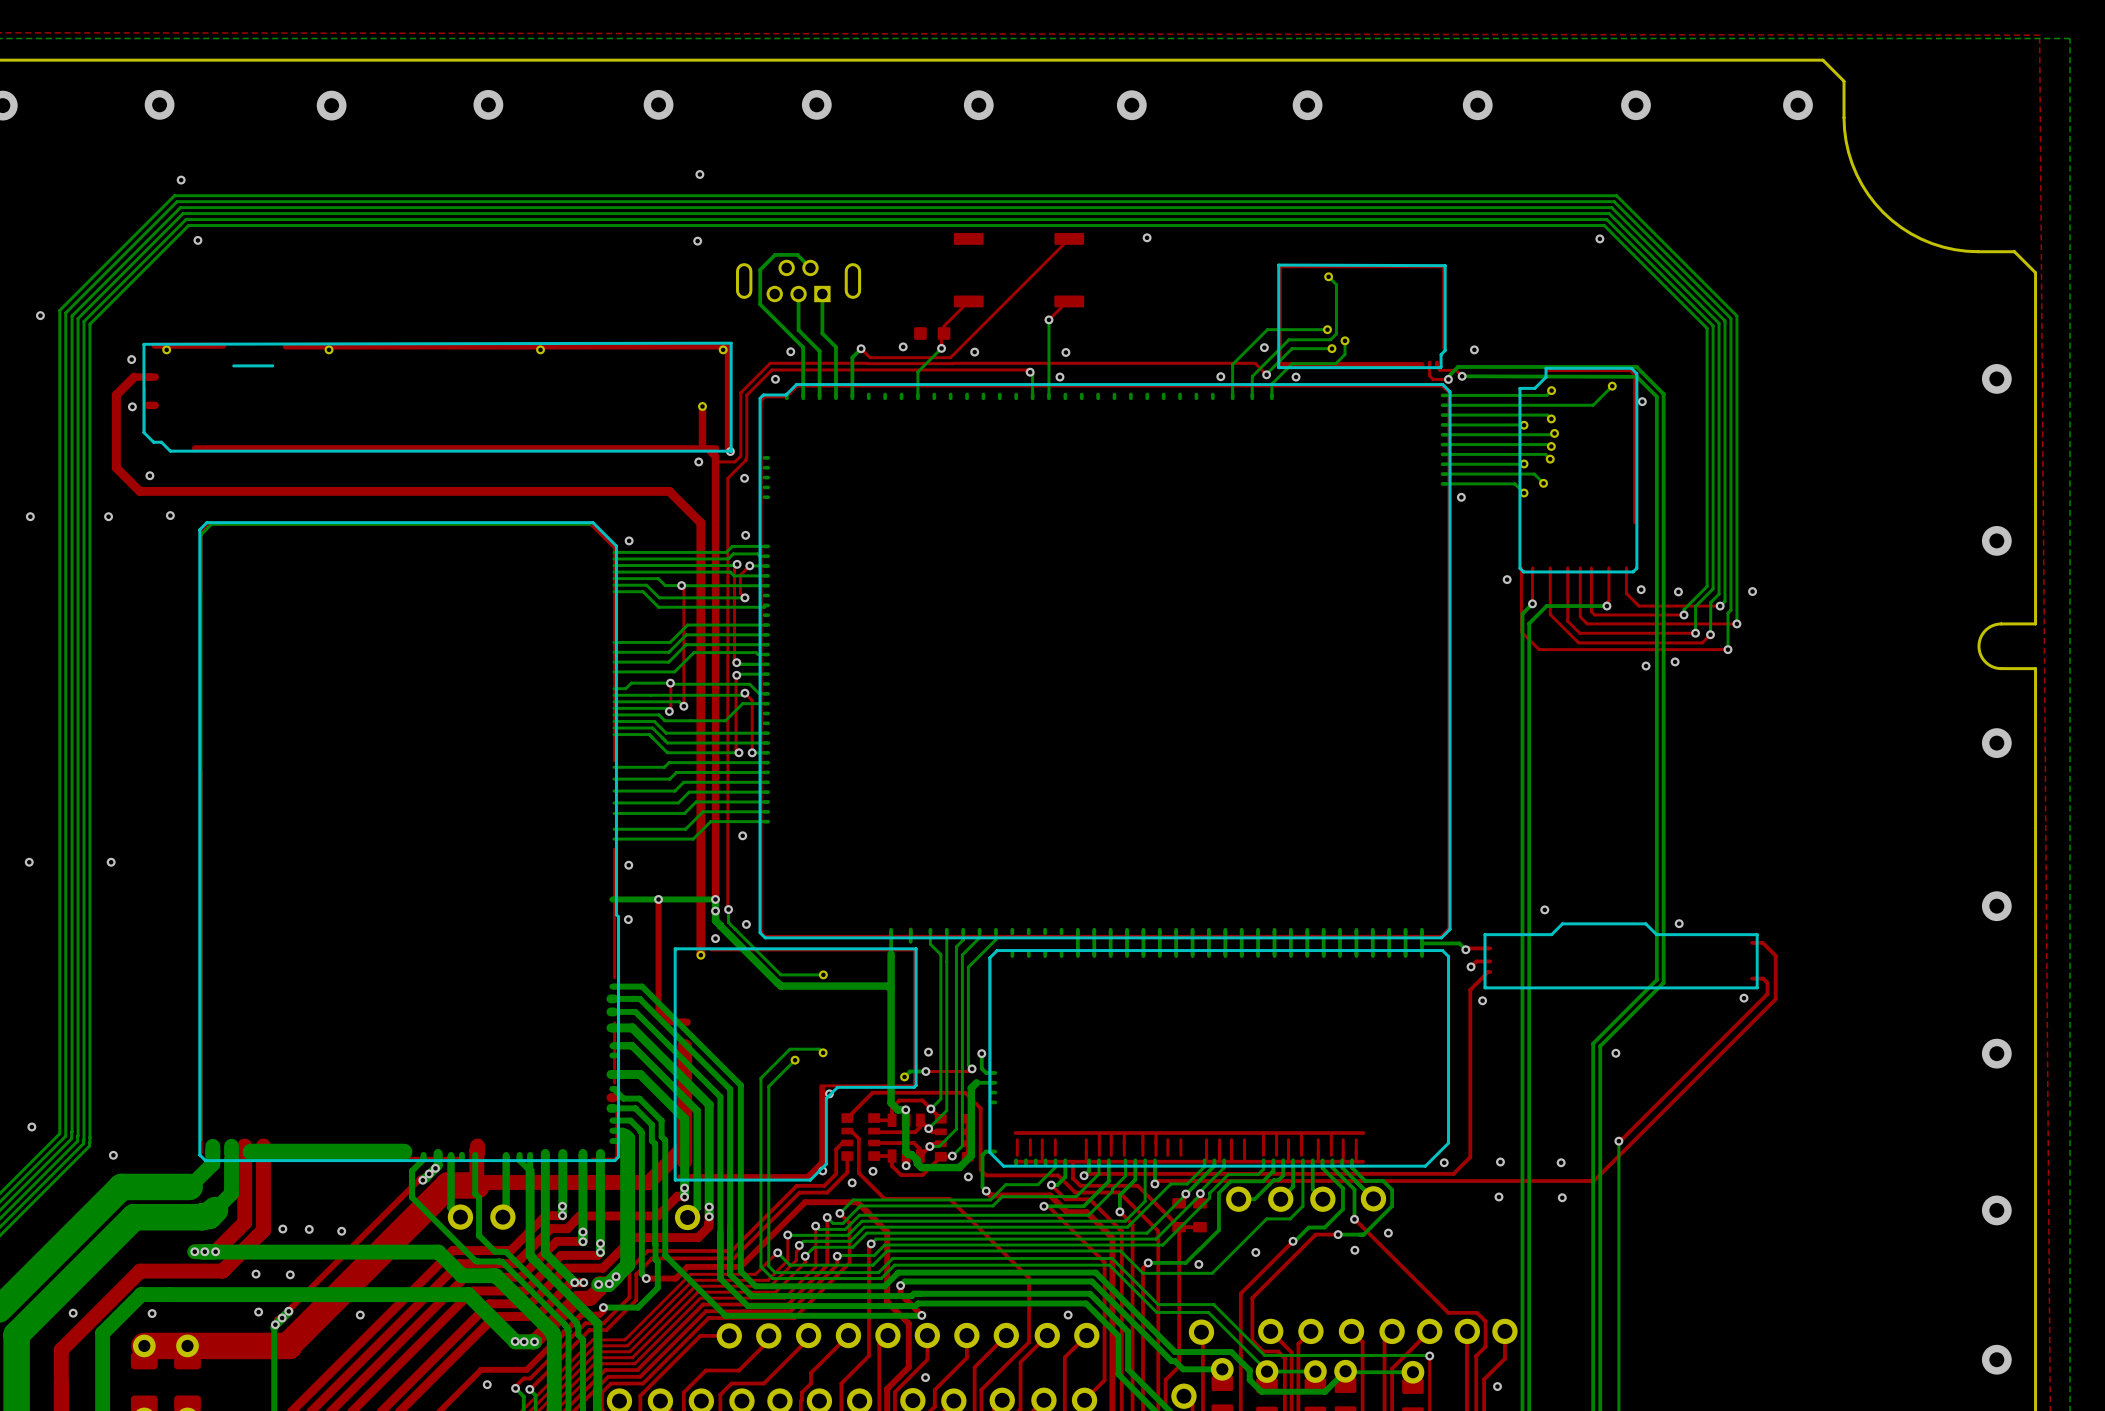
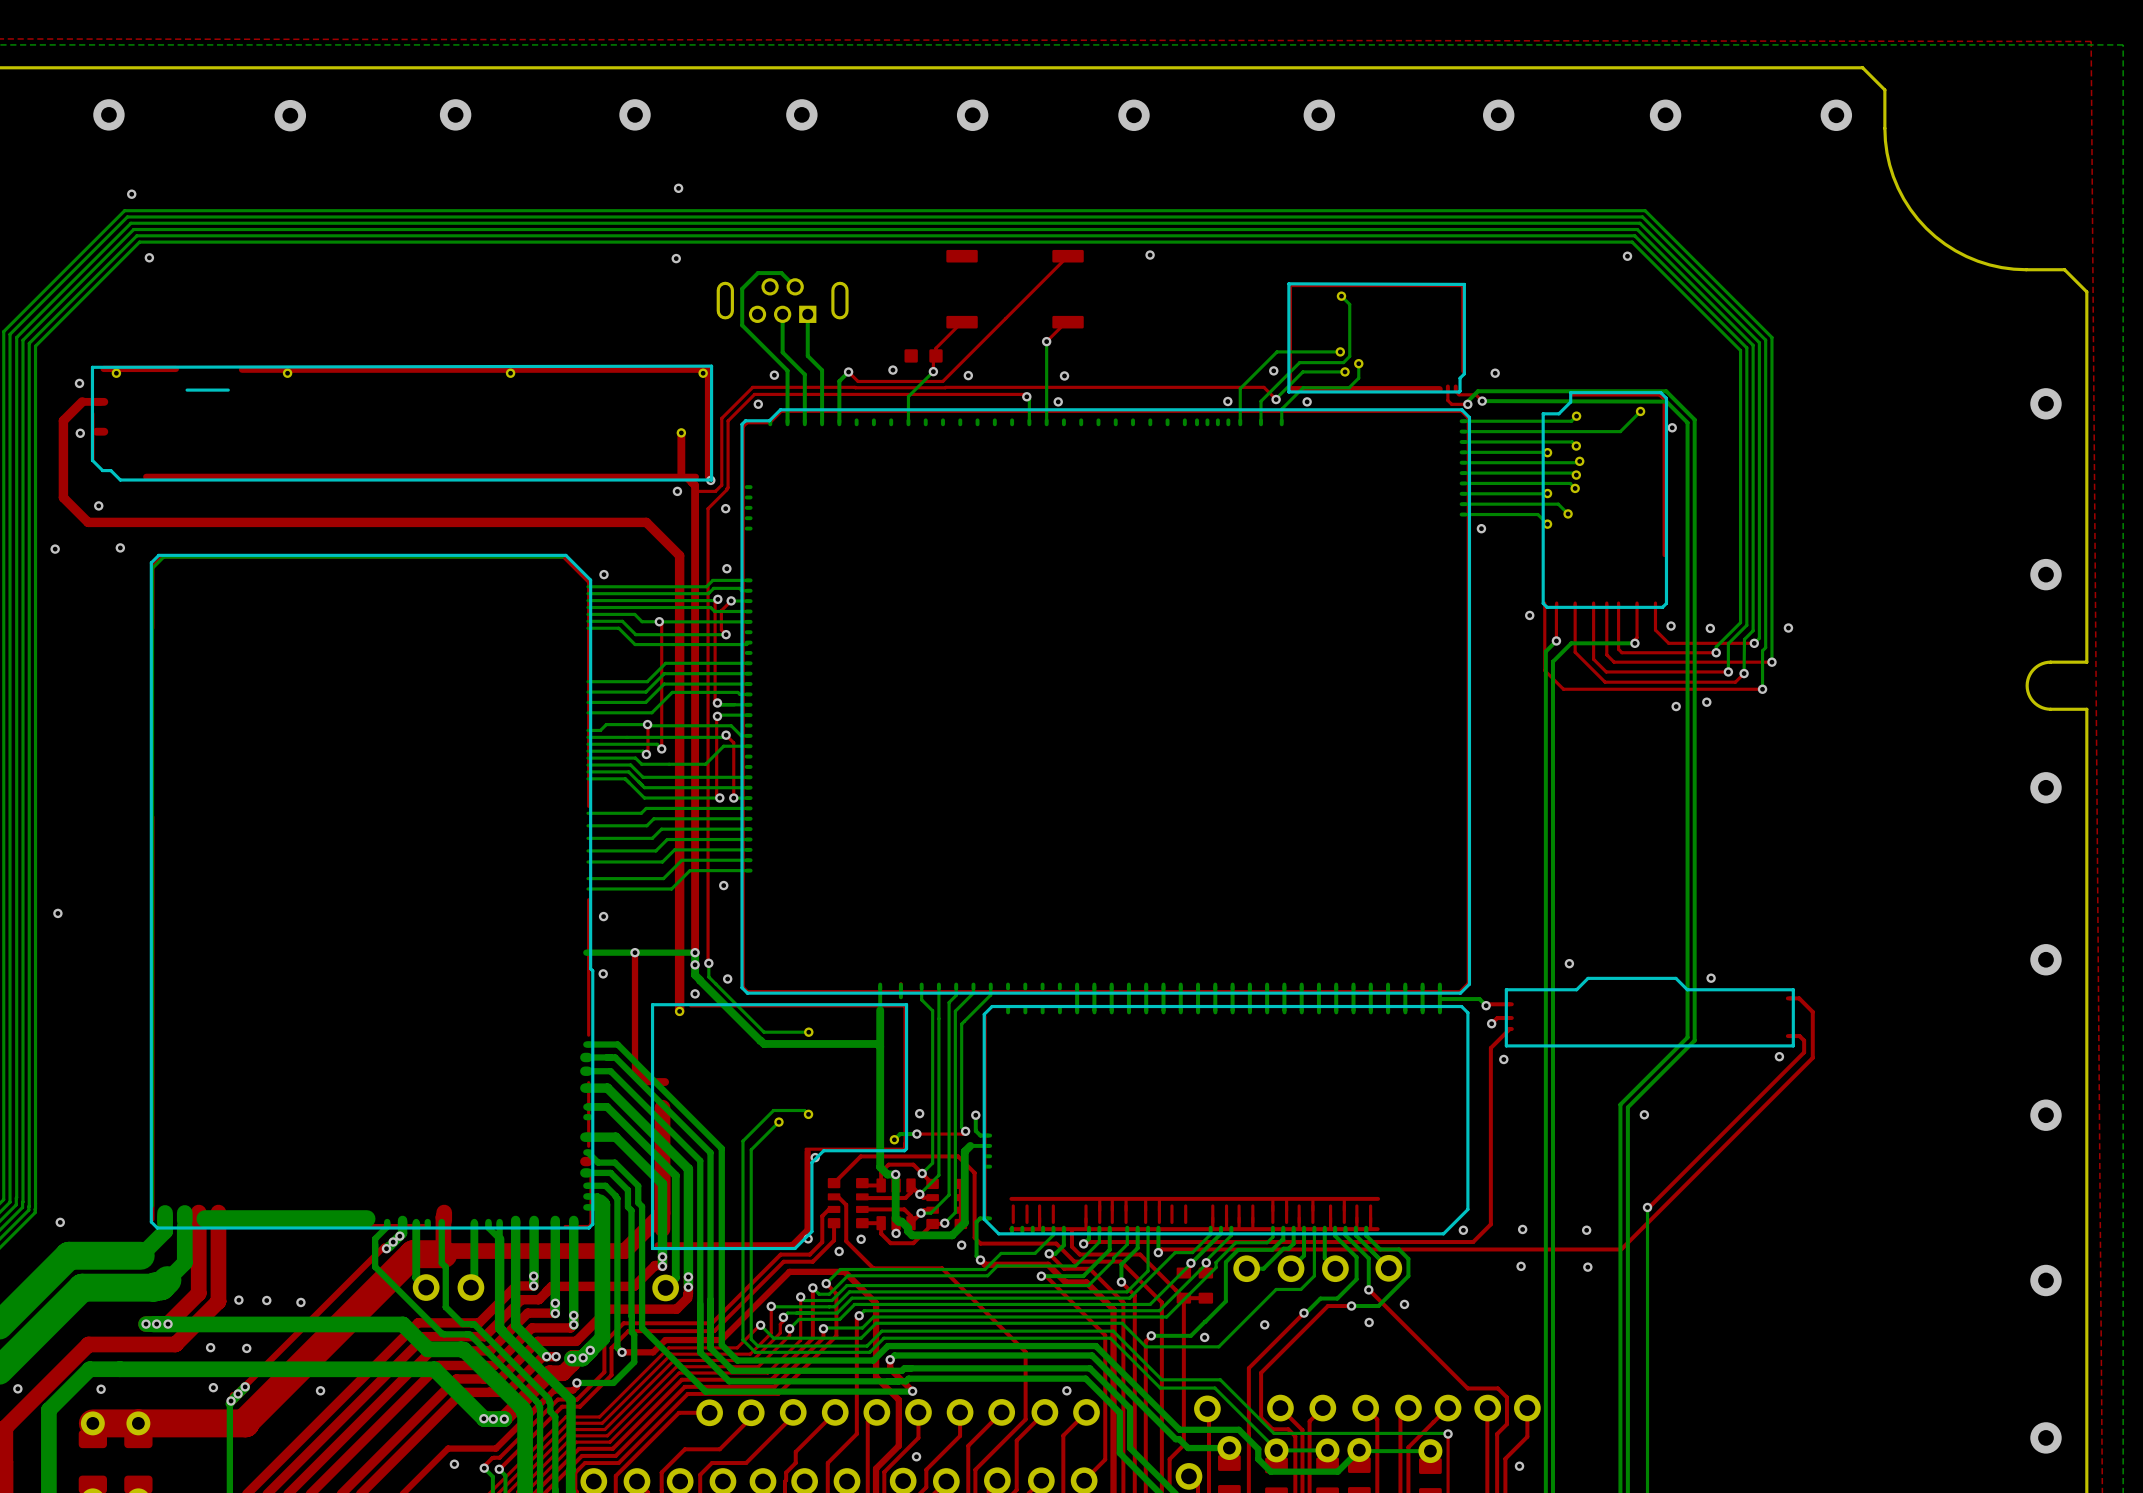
part footprint: [758, 383, 1452, 940] -> [740, 408, 1472, 995]

